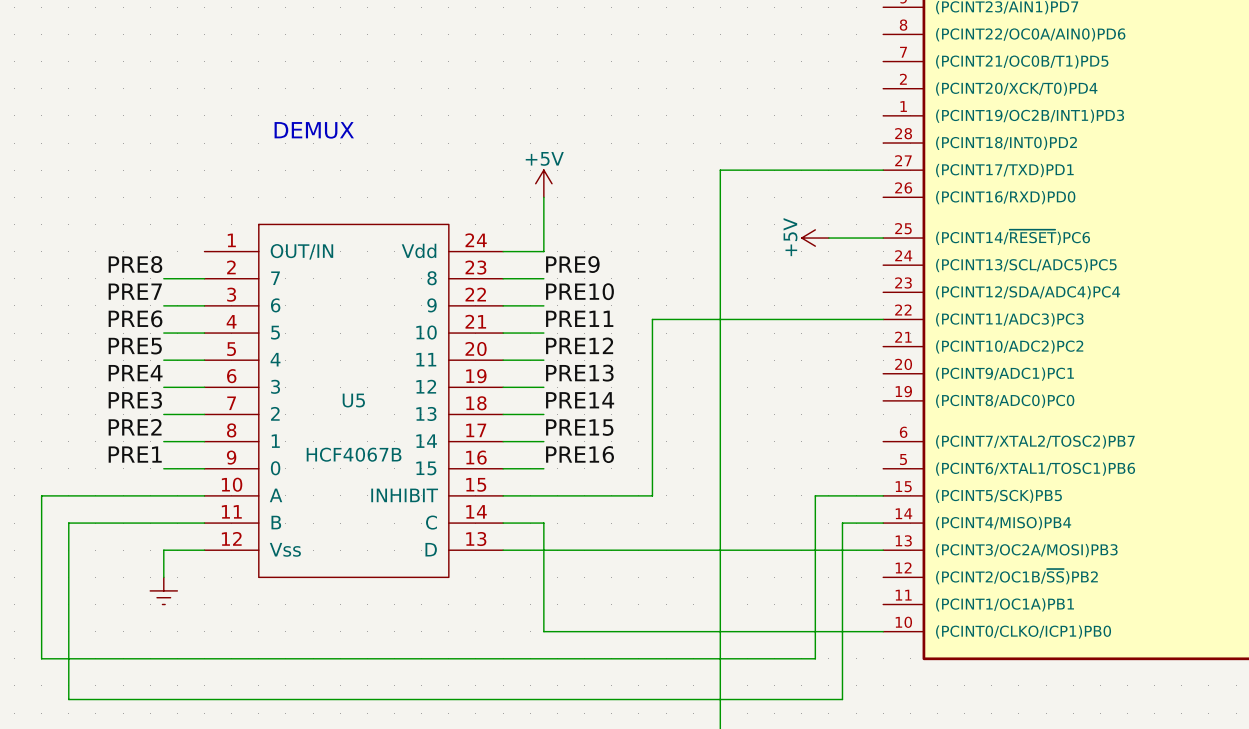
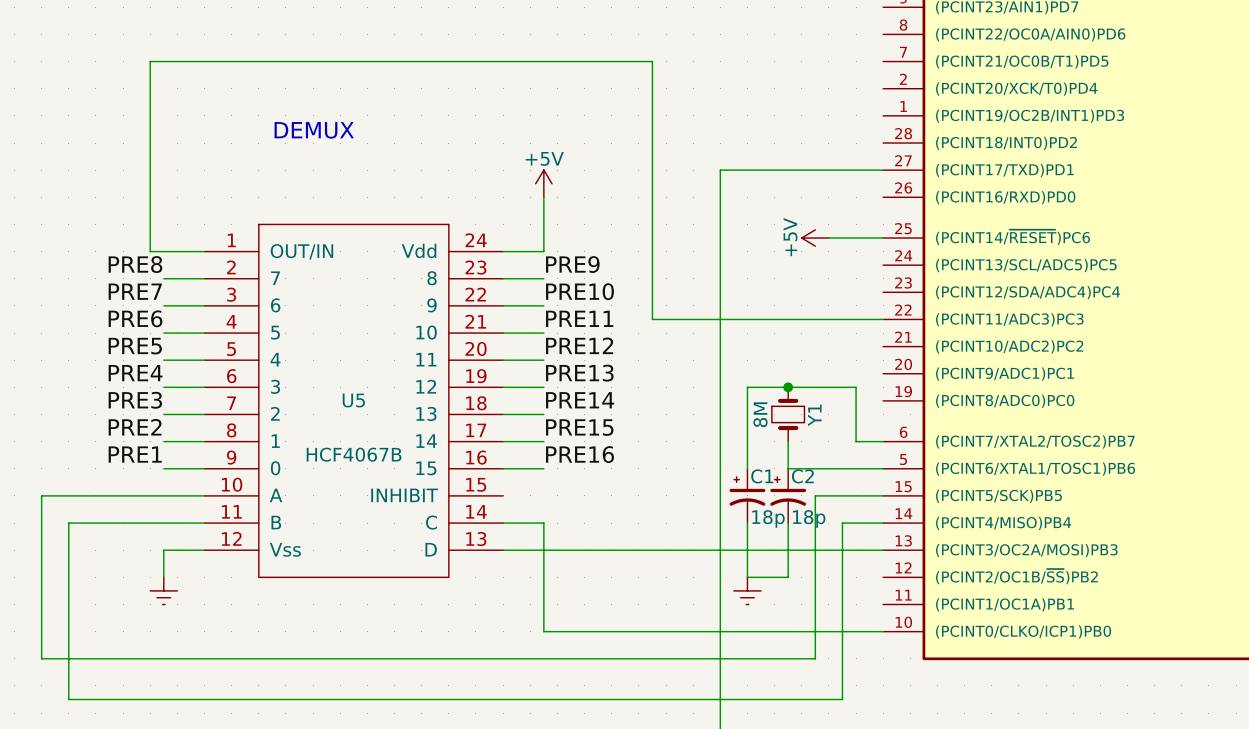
wire: (652, 319) (652, 495) (503, 495) -> (652, 319) (652, 61) (150, 61) (150, 251) (204, 251)
junction: none -> (788, 387)
Y1: none -> 8M (788, 414)
wire: none -> (788, 441) (788, 468) (883, 468)
wire: none -> (883, 441) (856, 441) (856, 387) (747, 387) (747, 468)
C1: none -> 18p (747, 495)
C2: none -> 18p (788, 495)
wire: none -> (747, 523) (747, 577) (788, 577) (788, 523)
power symbol: none -> (747, 590)

